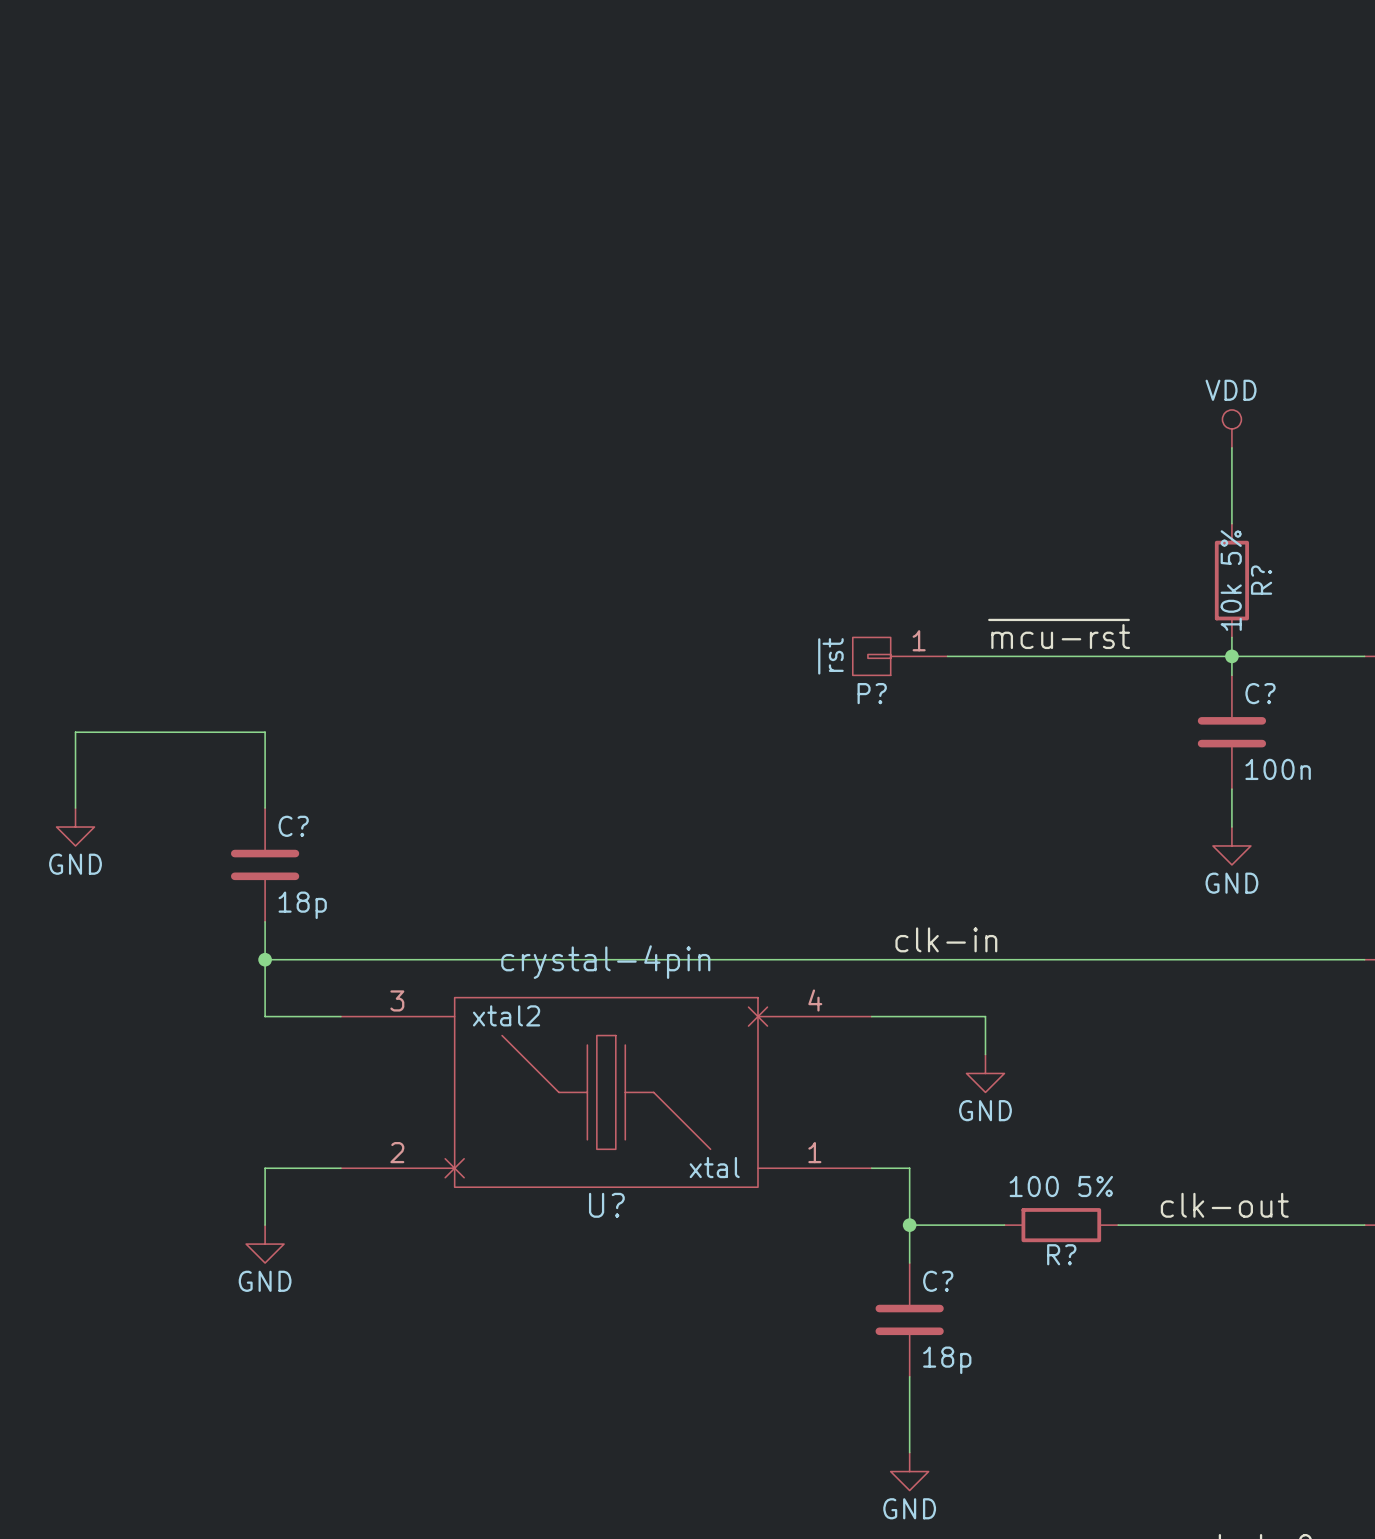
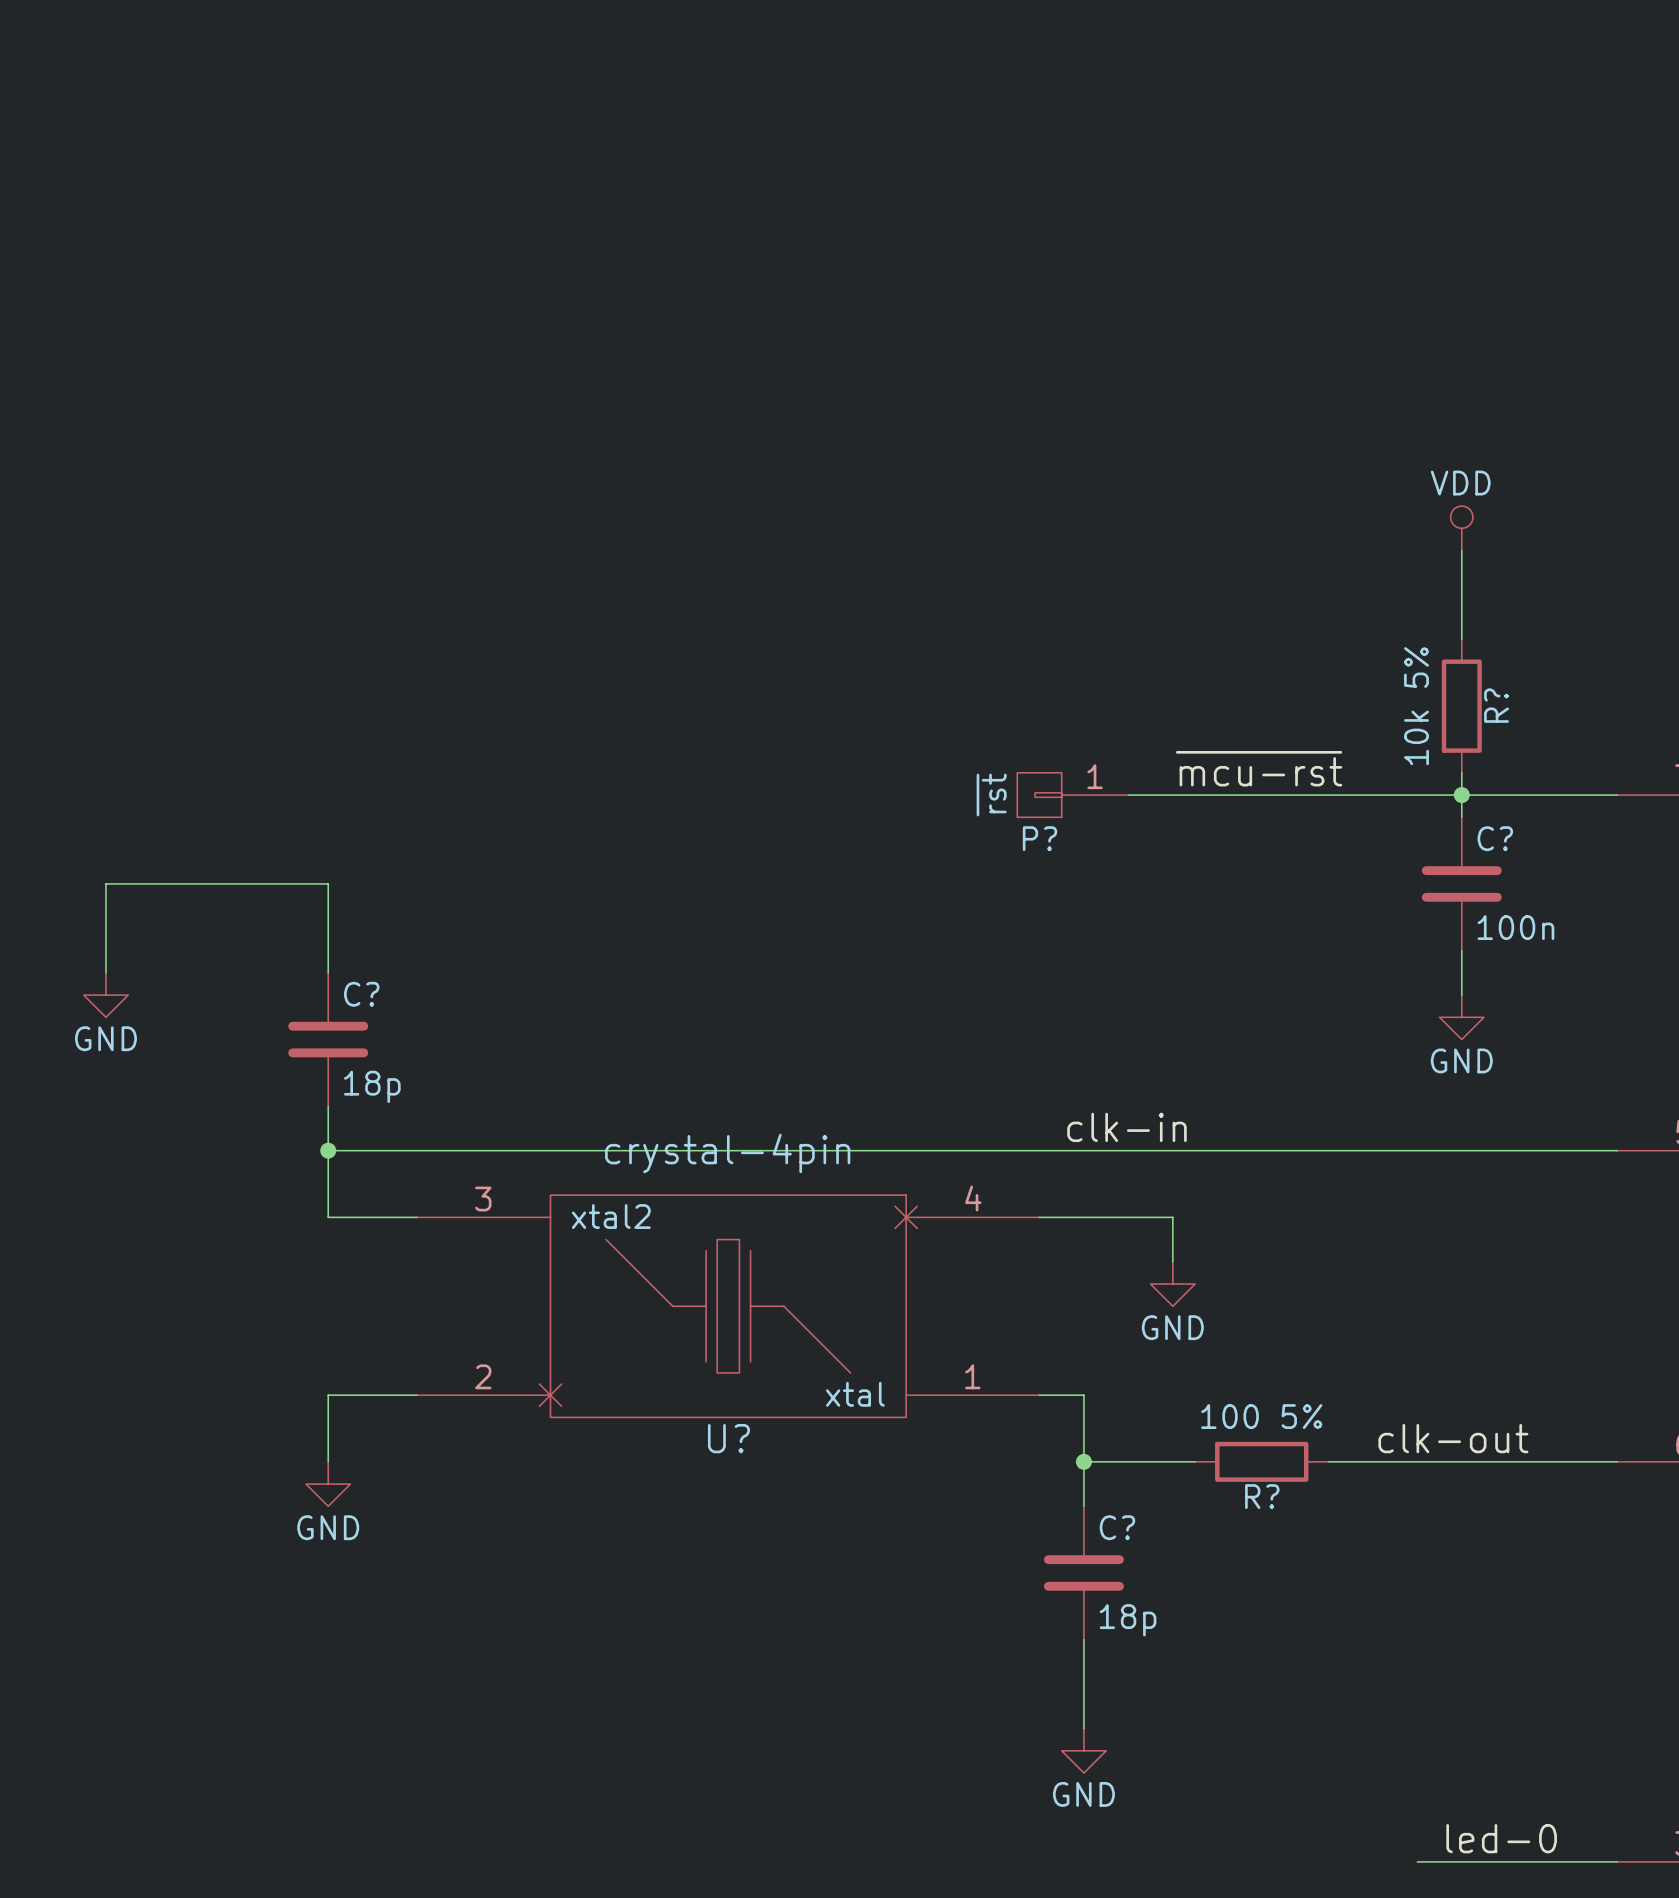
R? value position: 10k 5% (1231, 580) -> 10k 5% (1416, 706)

